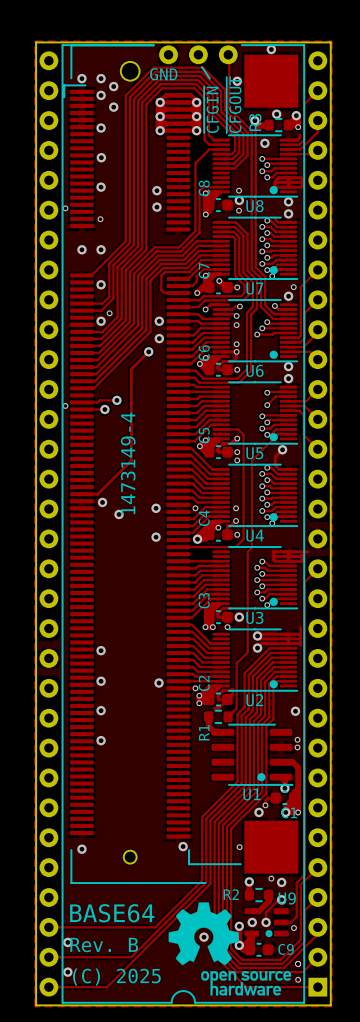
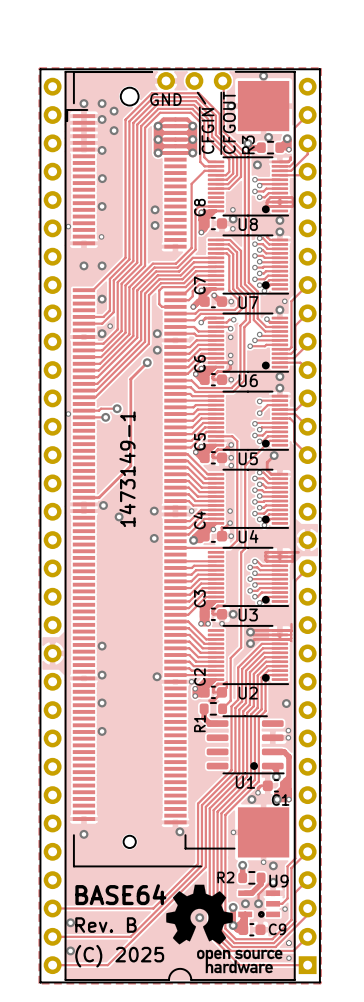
text: 1473149-4 (128, 463) -> 1473149-1 (127, 469)

